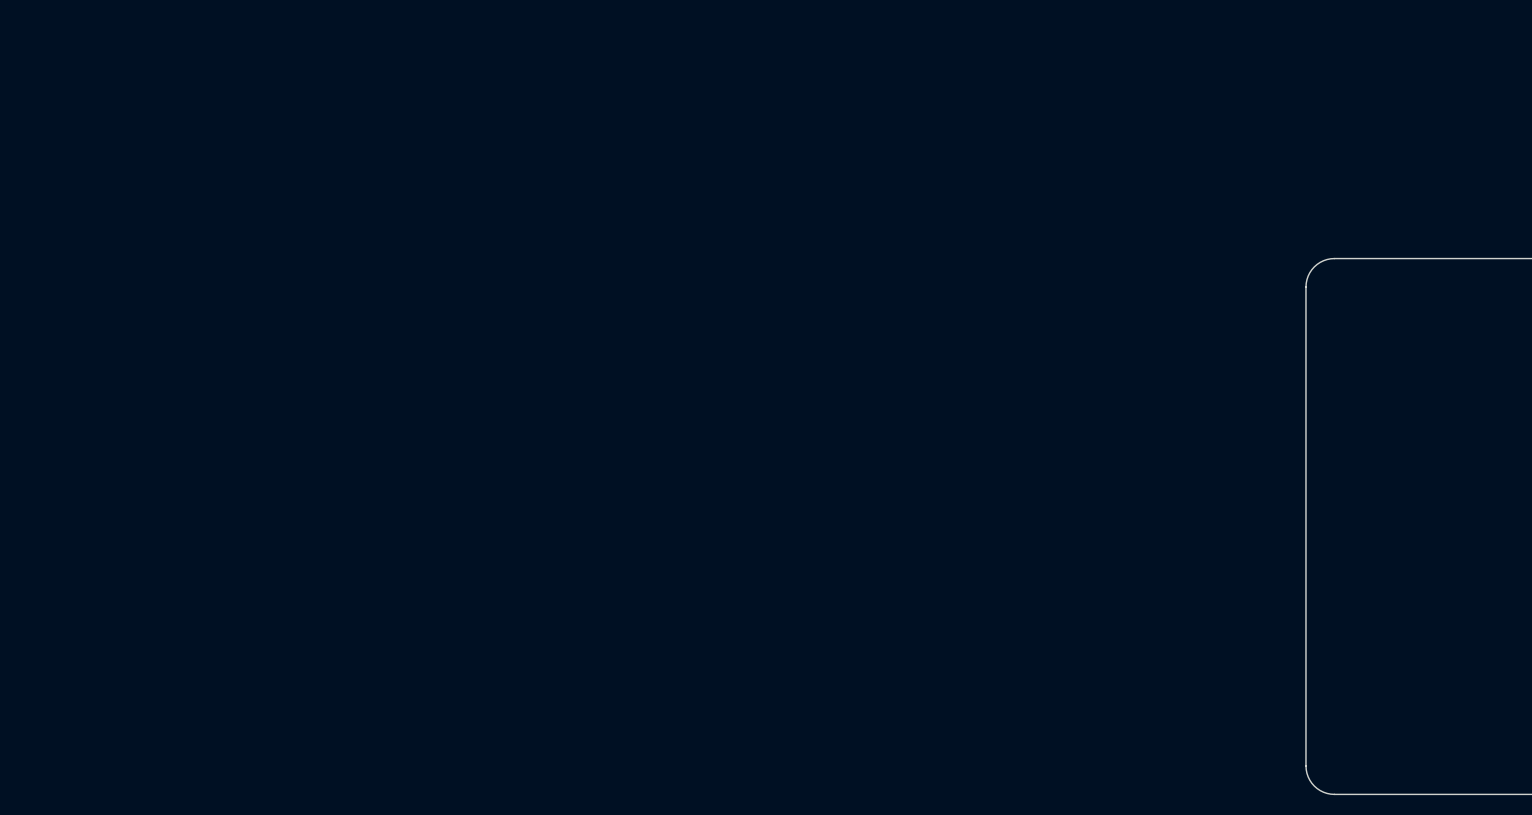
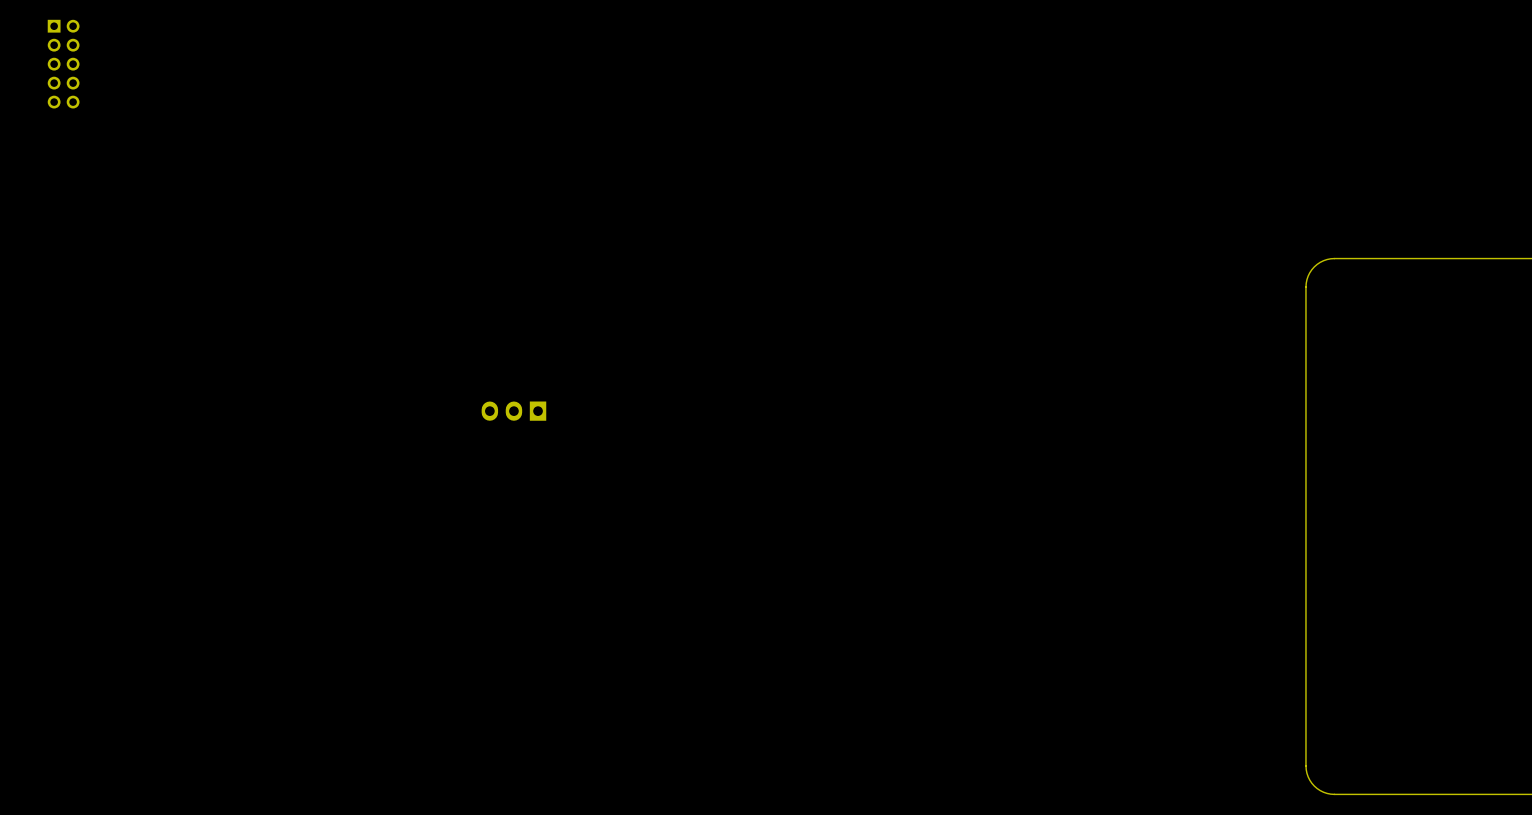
part: none -> (63, 64)
part: none -> (513, 411)

